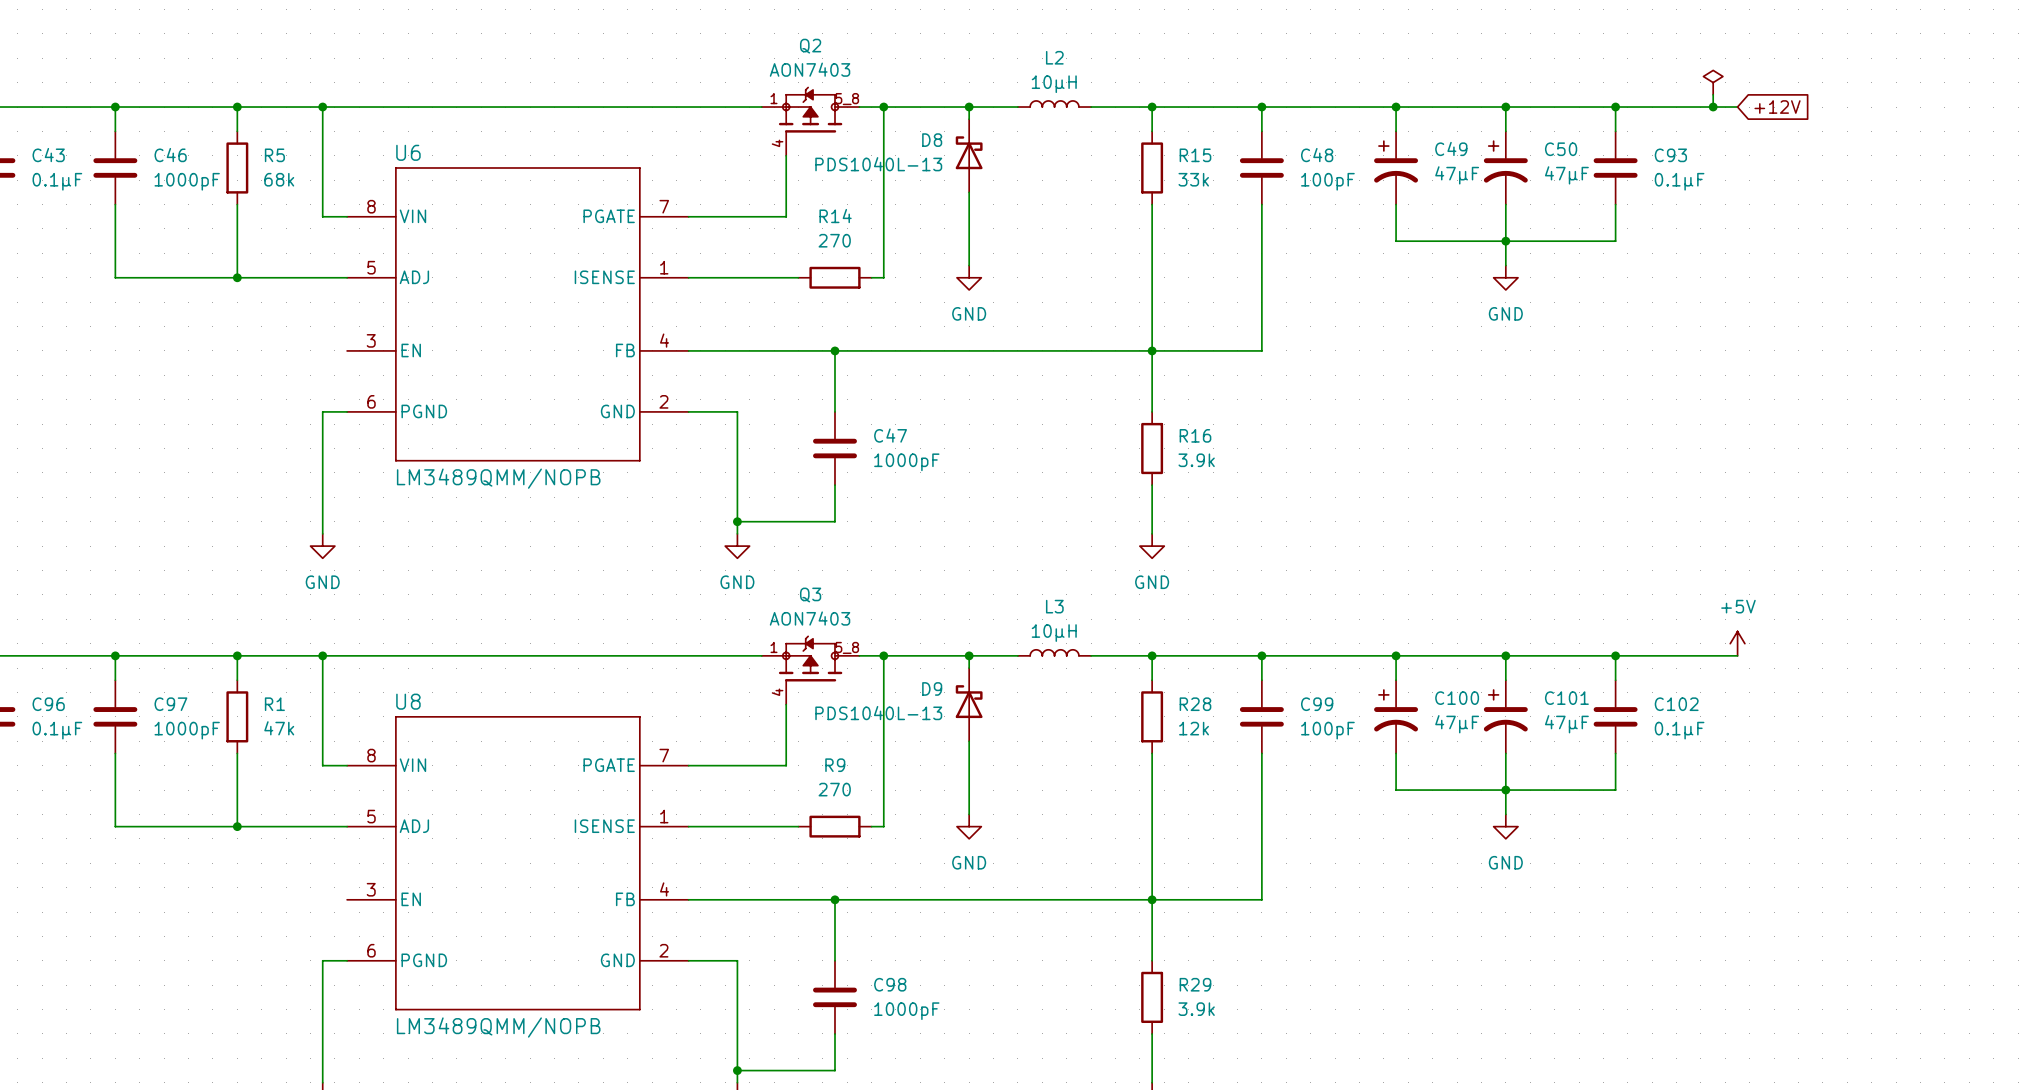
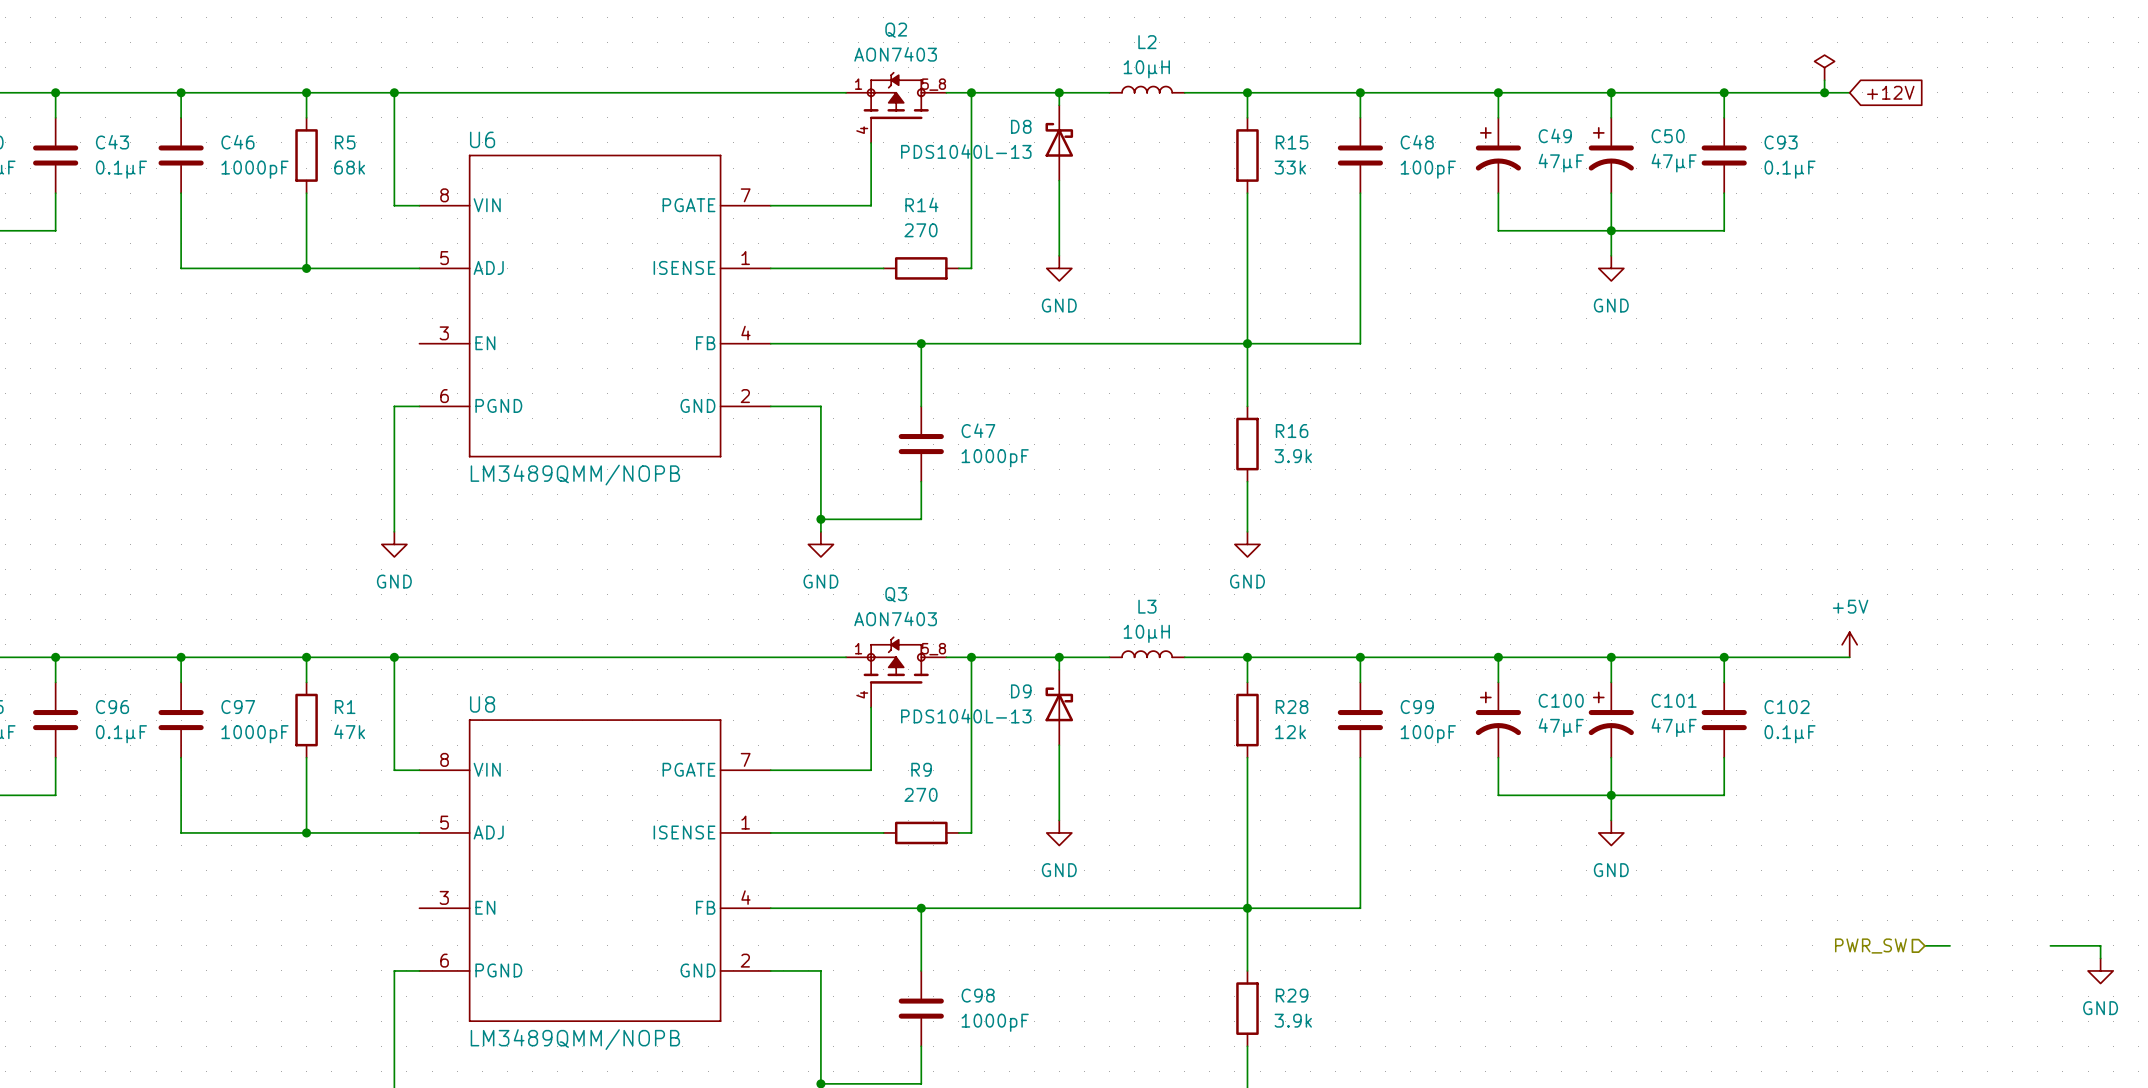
hierarchical label: none -> PWR_SW (1870, 946)
wire: none -> (1924, 945) (1950, 945)
wire: none -> (2050, 945) (2100, 945) (2100, 958)
power symbol: none -> GND (2100, 970)

